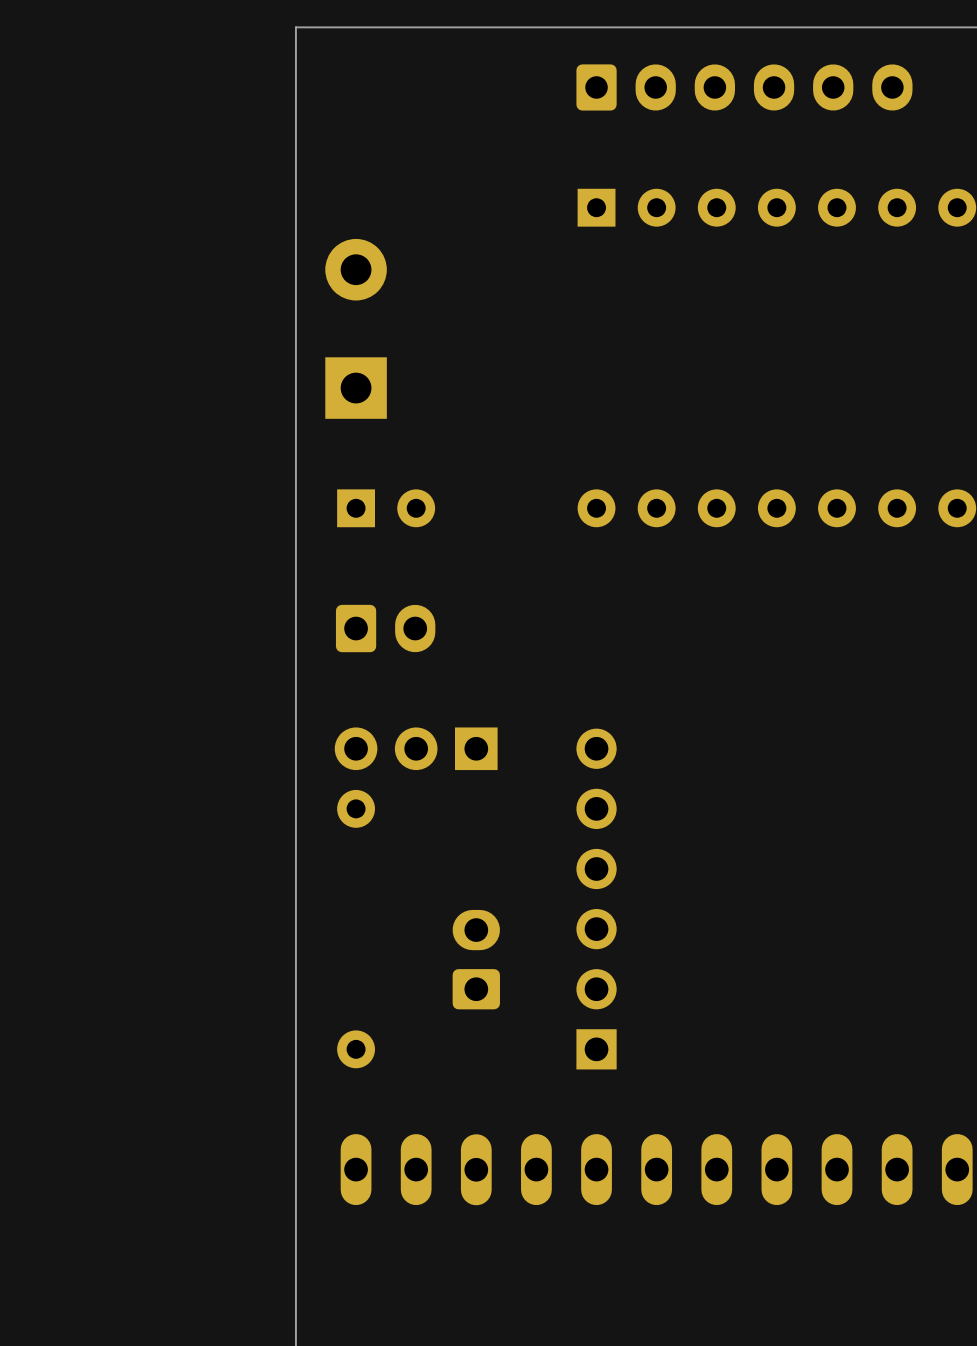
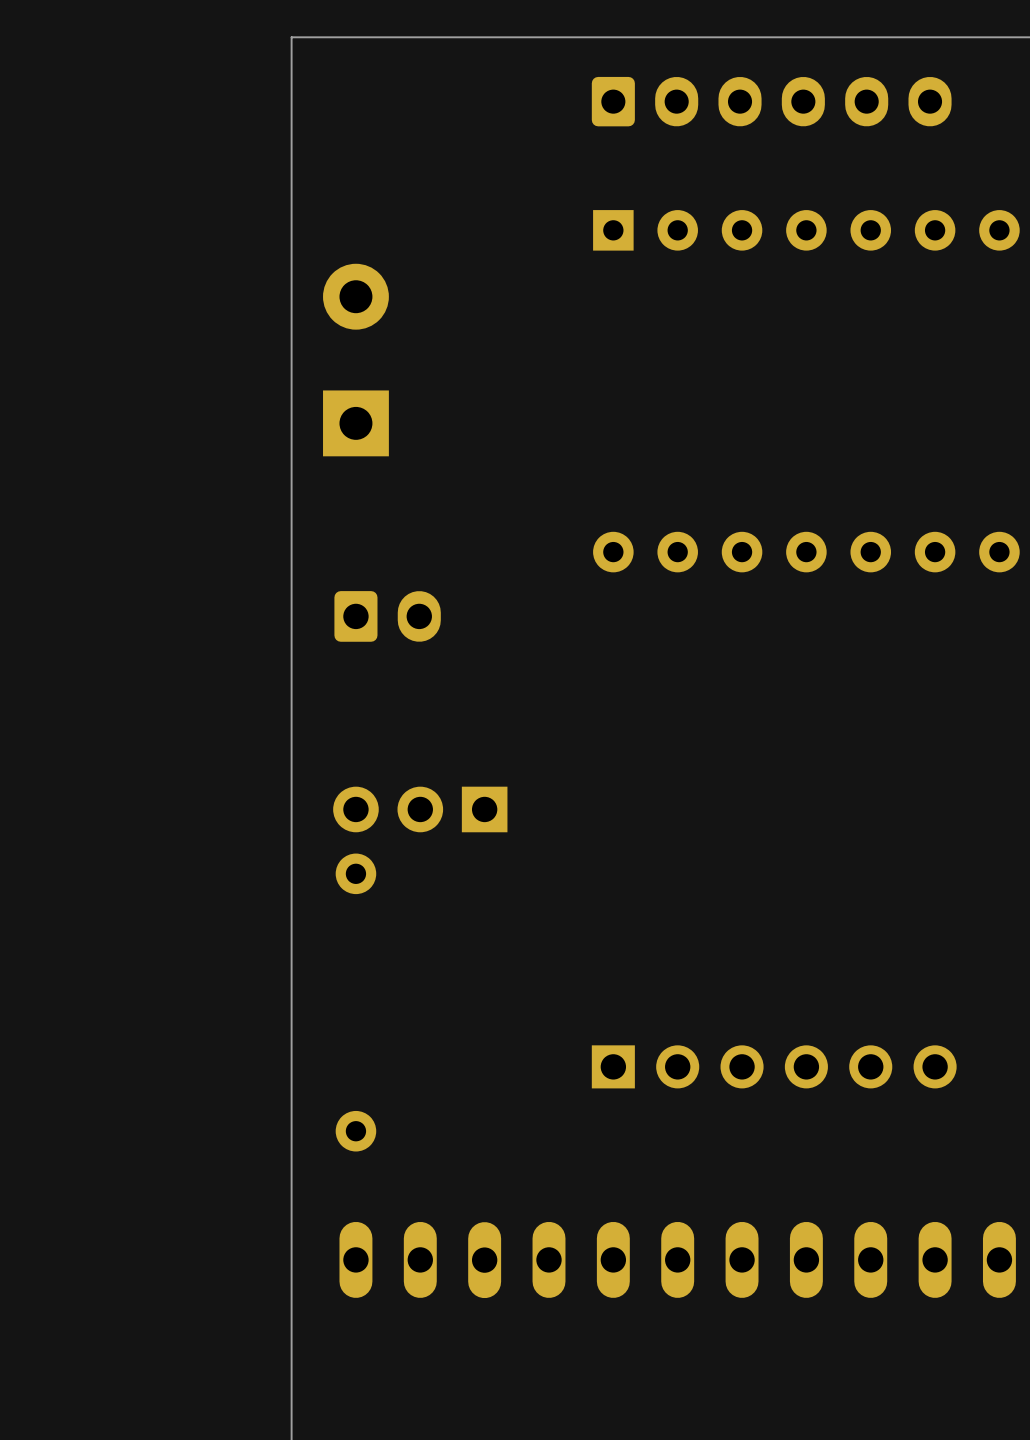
part: (386, 508) -> none
part position: (385, 628) -> (387, 616)
part rotation: 0° (596, 899) -> 90° clockwise (774, 1066)
part: (476, 959) -> none

